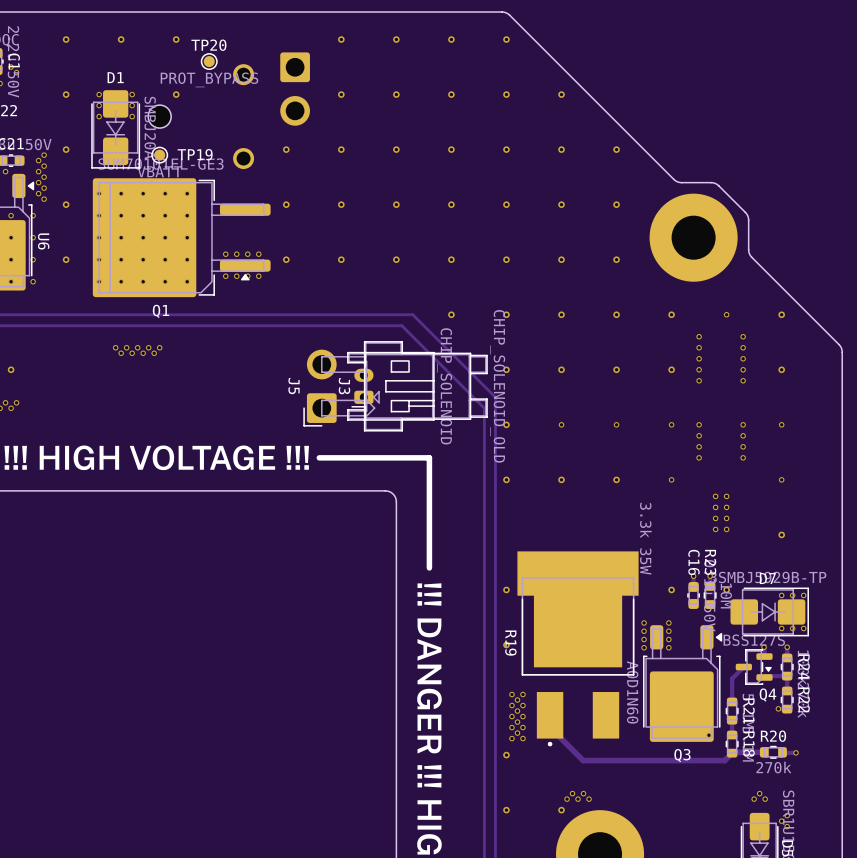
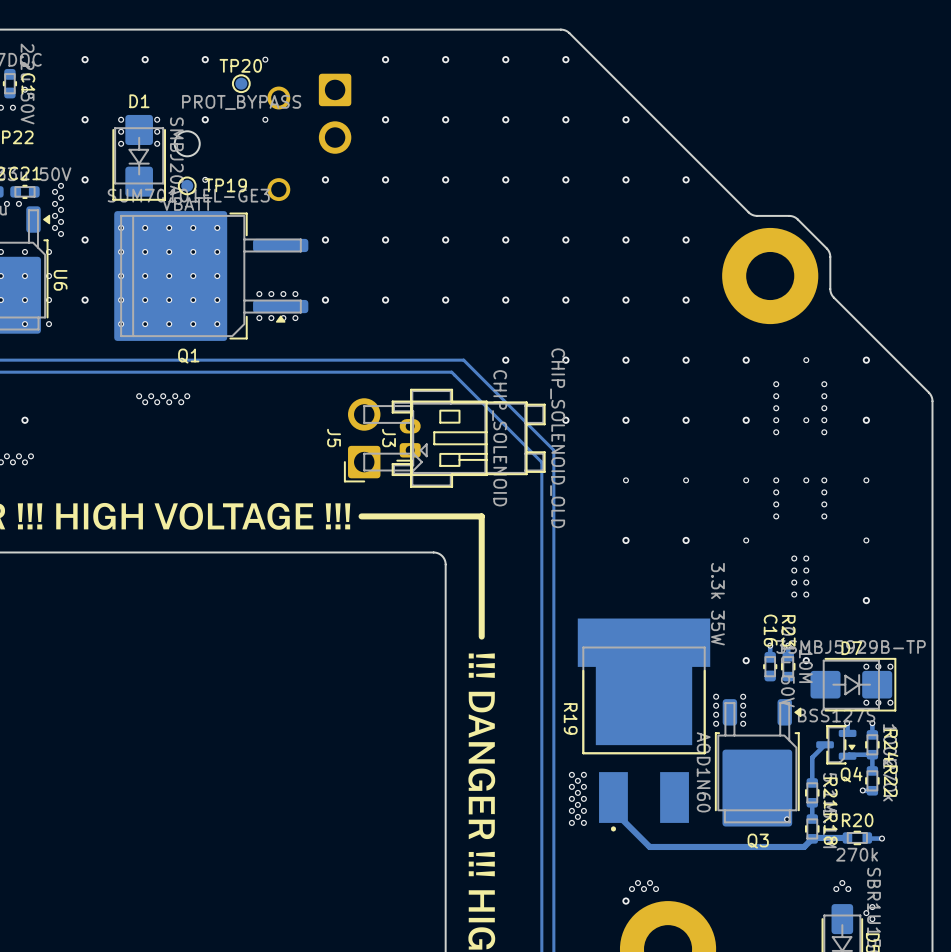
via: none -> (265, 59)
via: none -> (265, 119)
via: none -> (205, 179)
via: none -> (806, 420)
via: (506, 424) -> none
via: none -> (806, 480)
via: (506, 479) -> none
via: (506, 589) -> none
via: (506, 645) -> none
via: (506, 755) -> none
via: (506, 810) -> none

